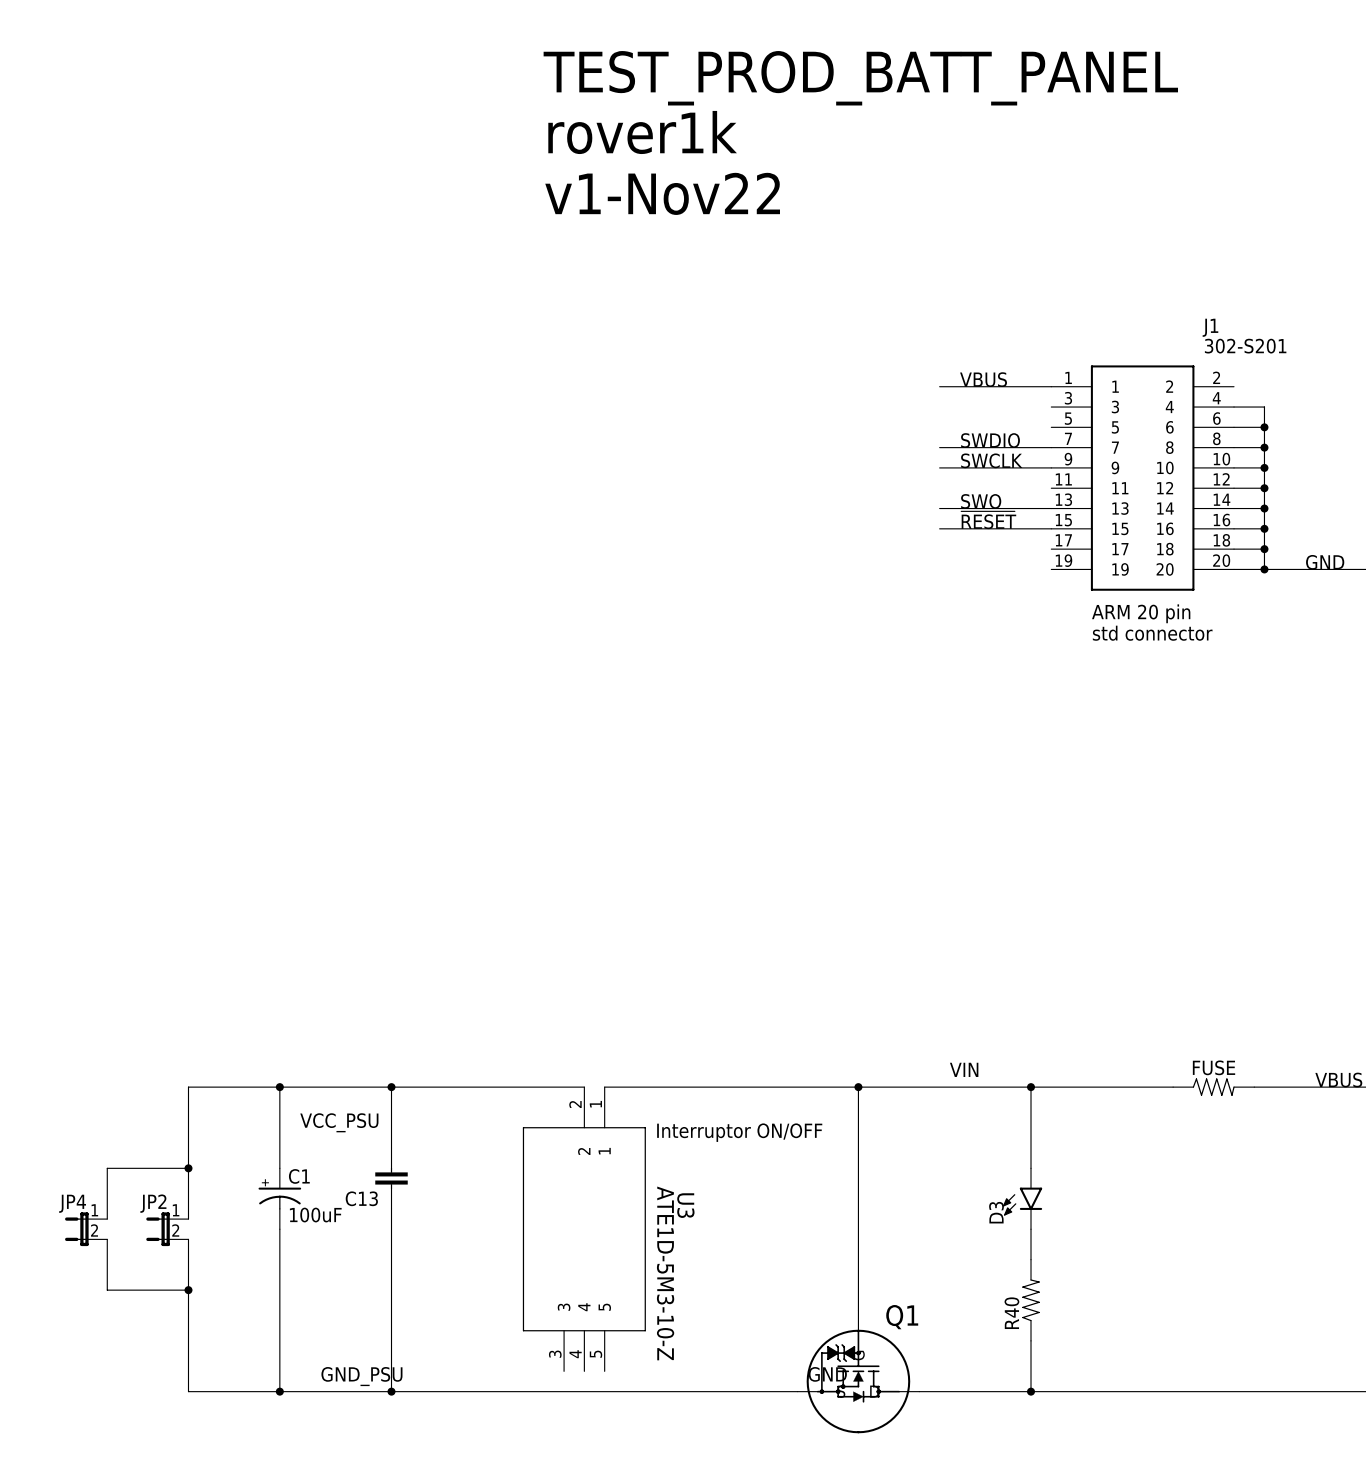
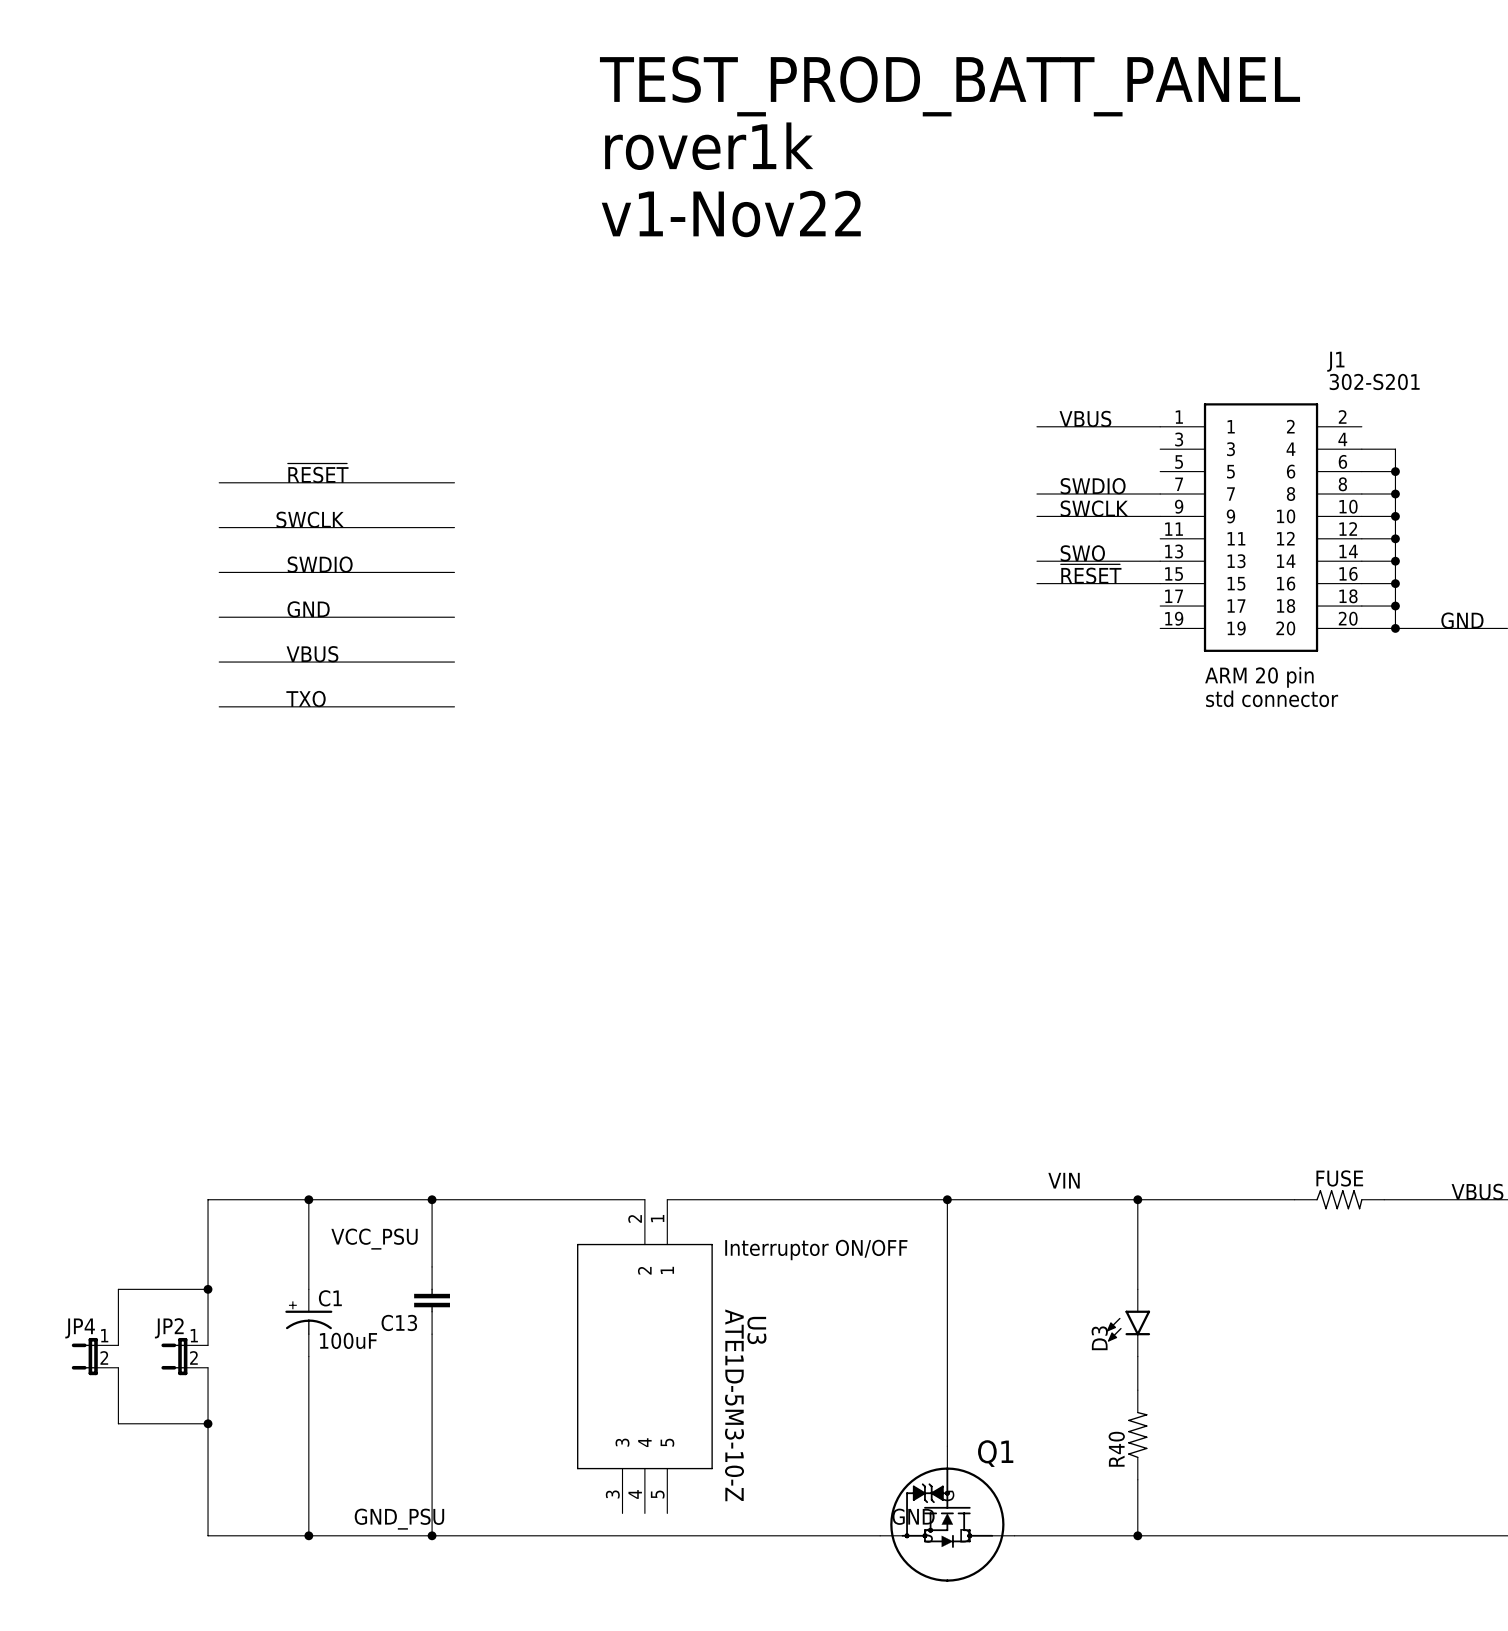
label: none -> ~{RESET} (318, 473)
wire: none -> (219, 482) (454, 482)
label: none -> SWCLK (310, 519)
wire: none -> (219, 527) (454, 527)
label: none -> SWDIO (320, 564)
wire: none -> (219, 572) (454, 572)
label: none -> GND (308, 609)
wire: none -> (219, 617) (454, 617)
label: none -> VBUS (312, 654)
wire: none -> (219, 662) (454, 662)
label: none -> TXO (306, 699)
wire: none -> (219, 706) (454, 706)

